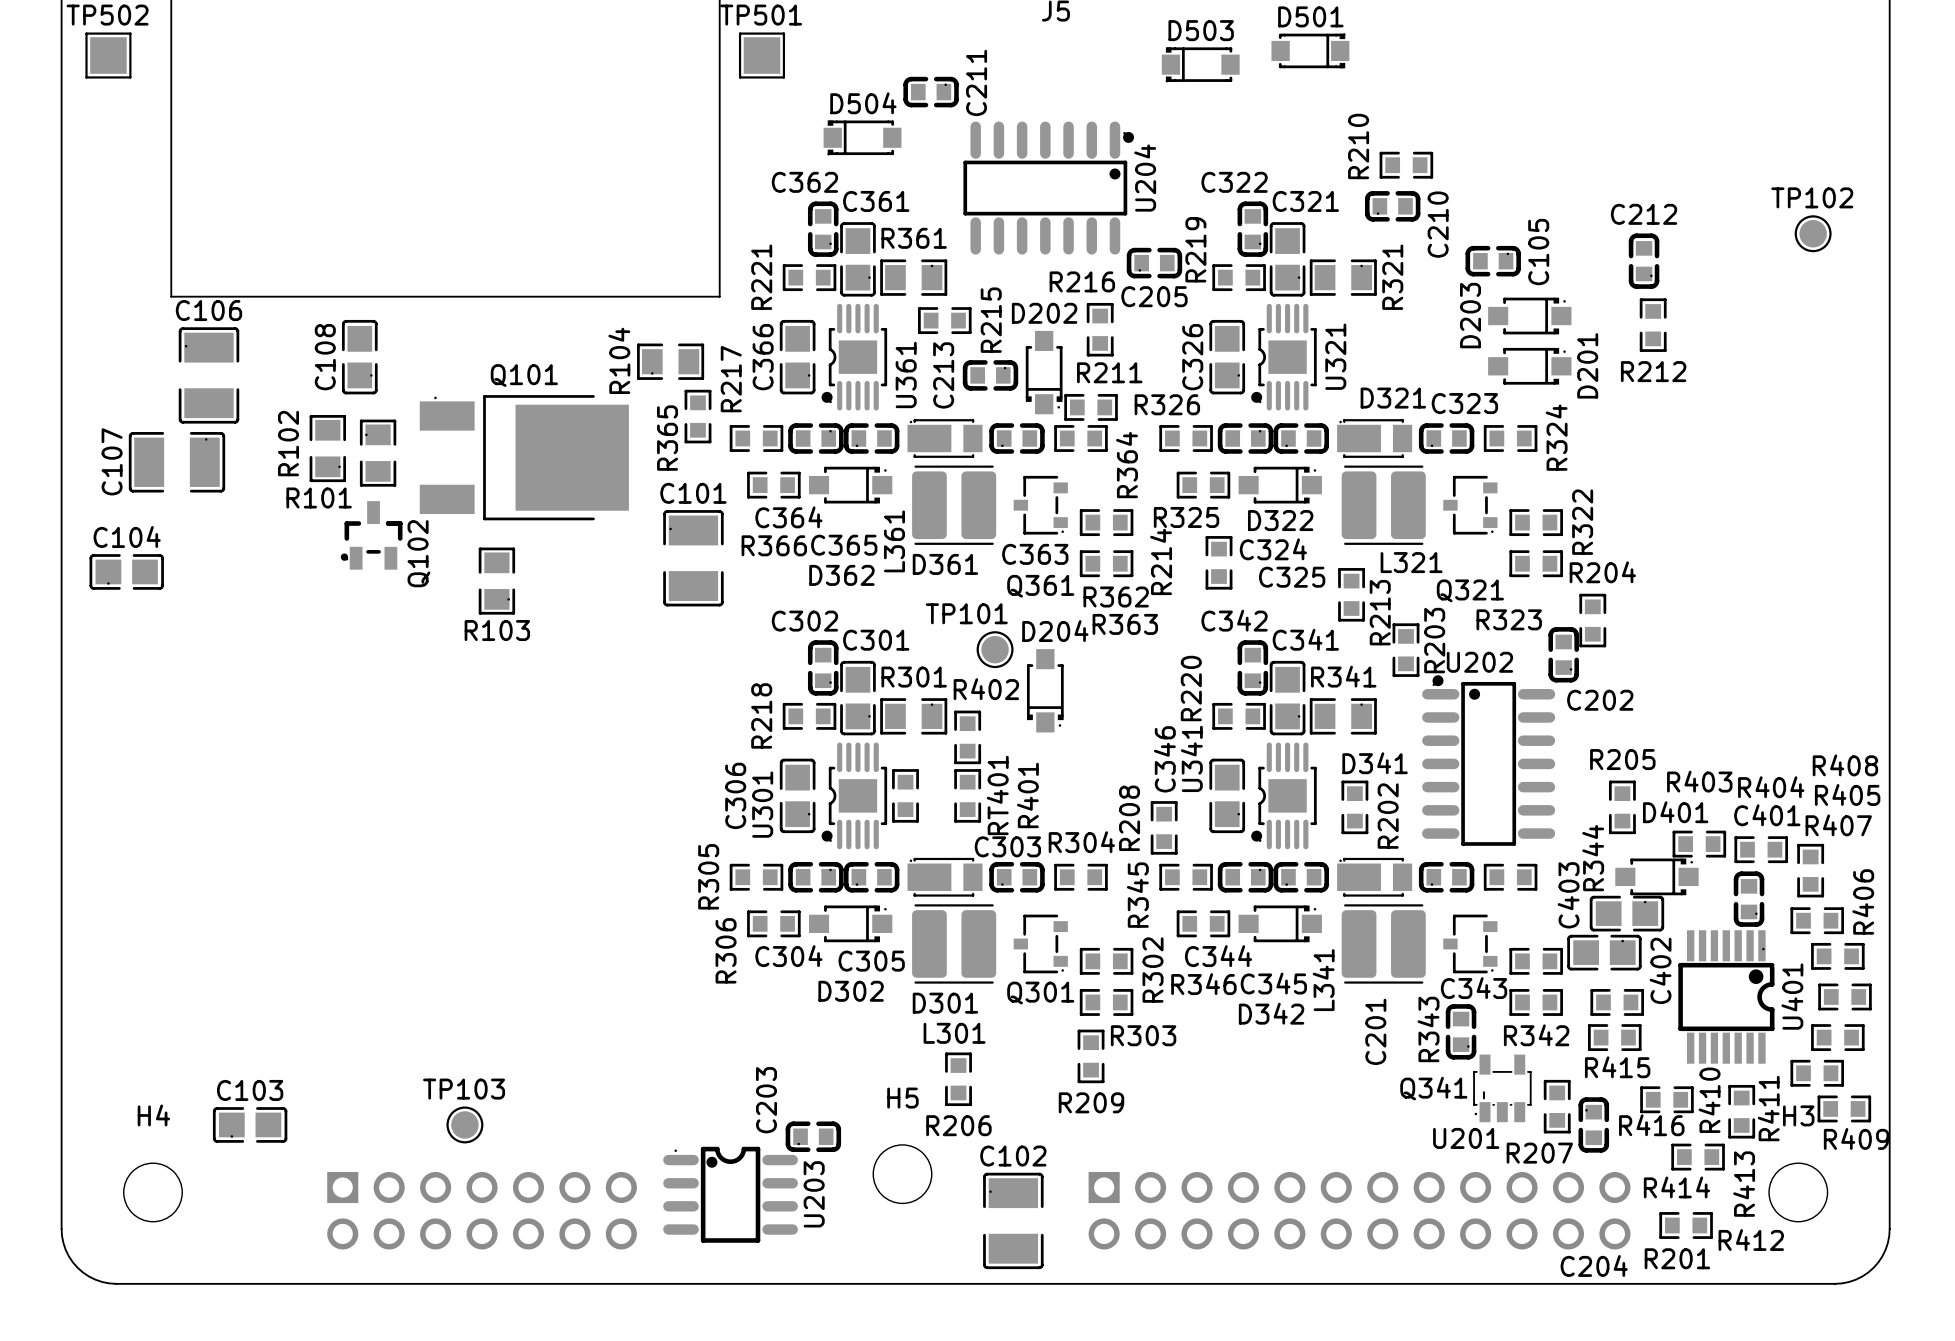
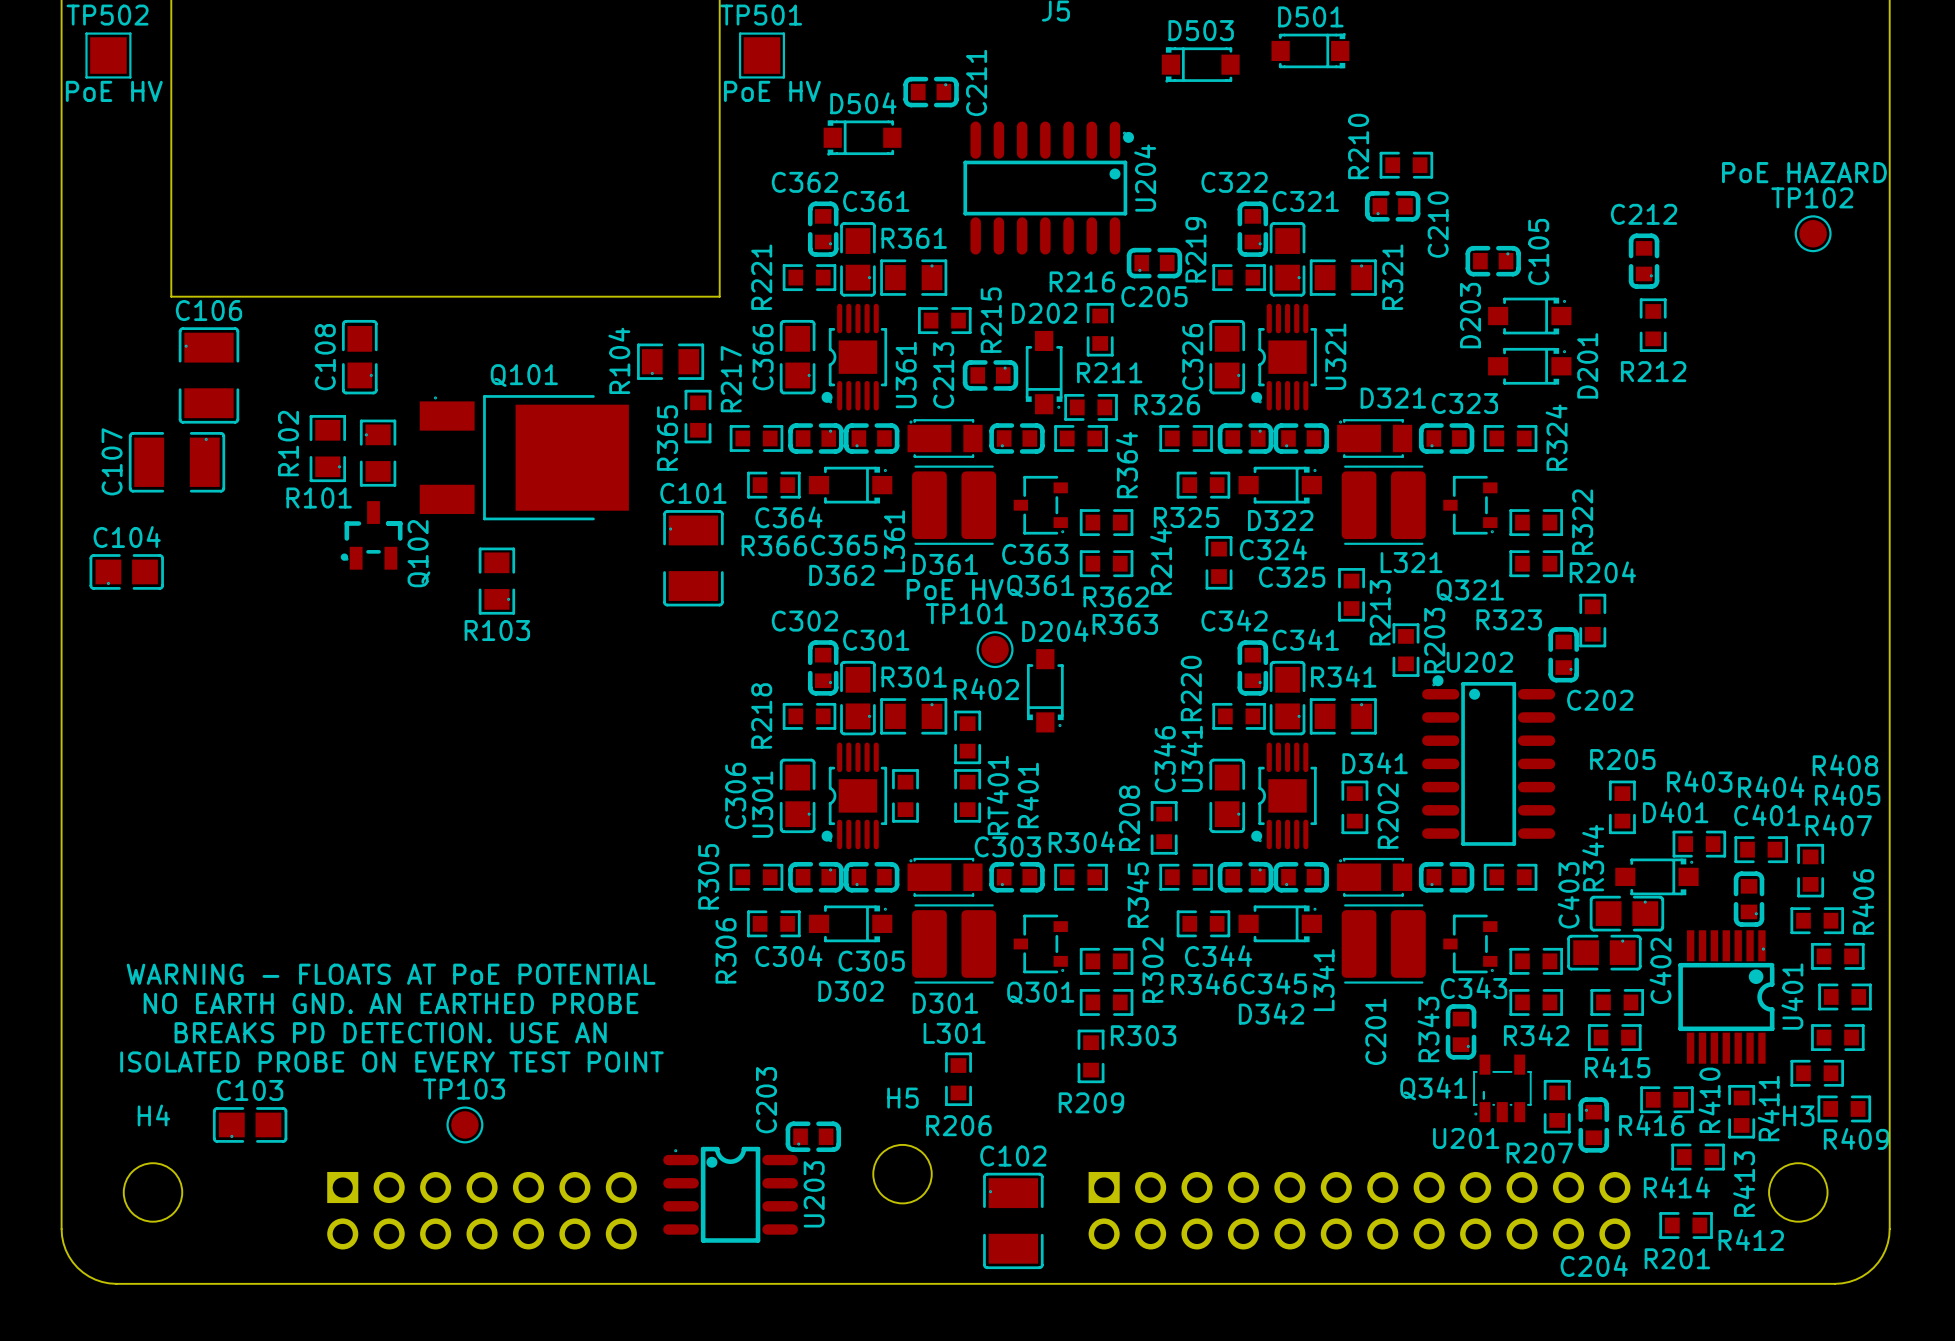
text: none -> PoE HV (114, 91)
text: none -> PoE HV (772, 91)
text: none -> PoE HAZARD (1804, 172)
text: none -> PoE HV (955, 589)
text: none -> WARNING - FLOATS AT PoE POTENTIAL (391, 974)
text: none -> NO EARTH GND. AN EARTHED PROBE (391, 1003)
text: none -> BREAKS PD DETECTION. USE AN (390, 1032)
text: none -> ISOLATED PROBE ON EVERY TEST POINT (391, 1061)

